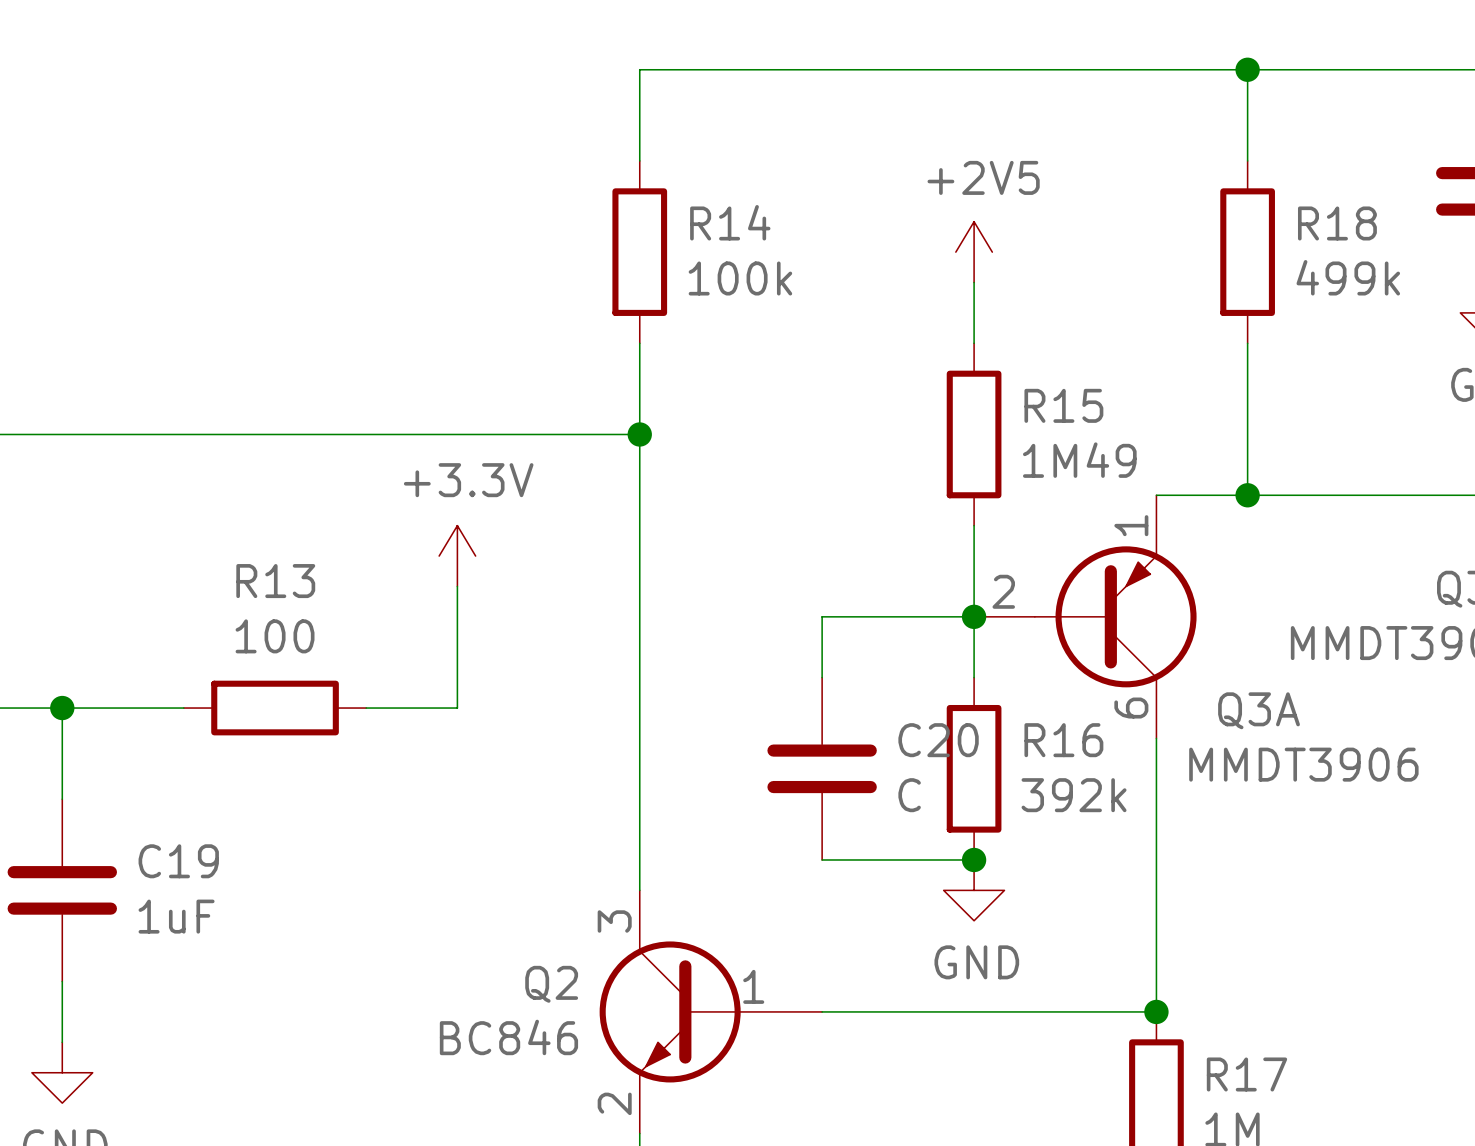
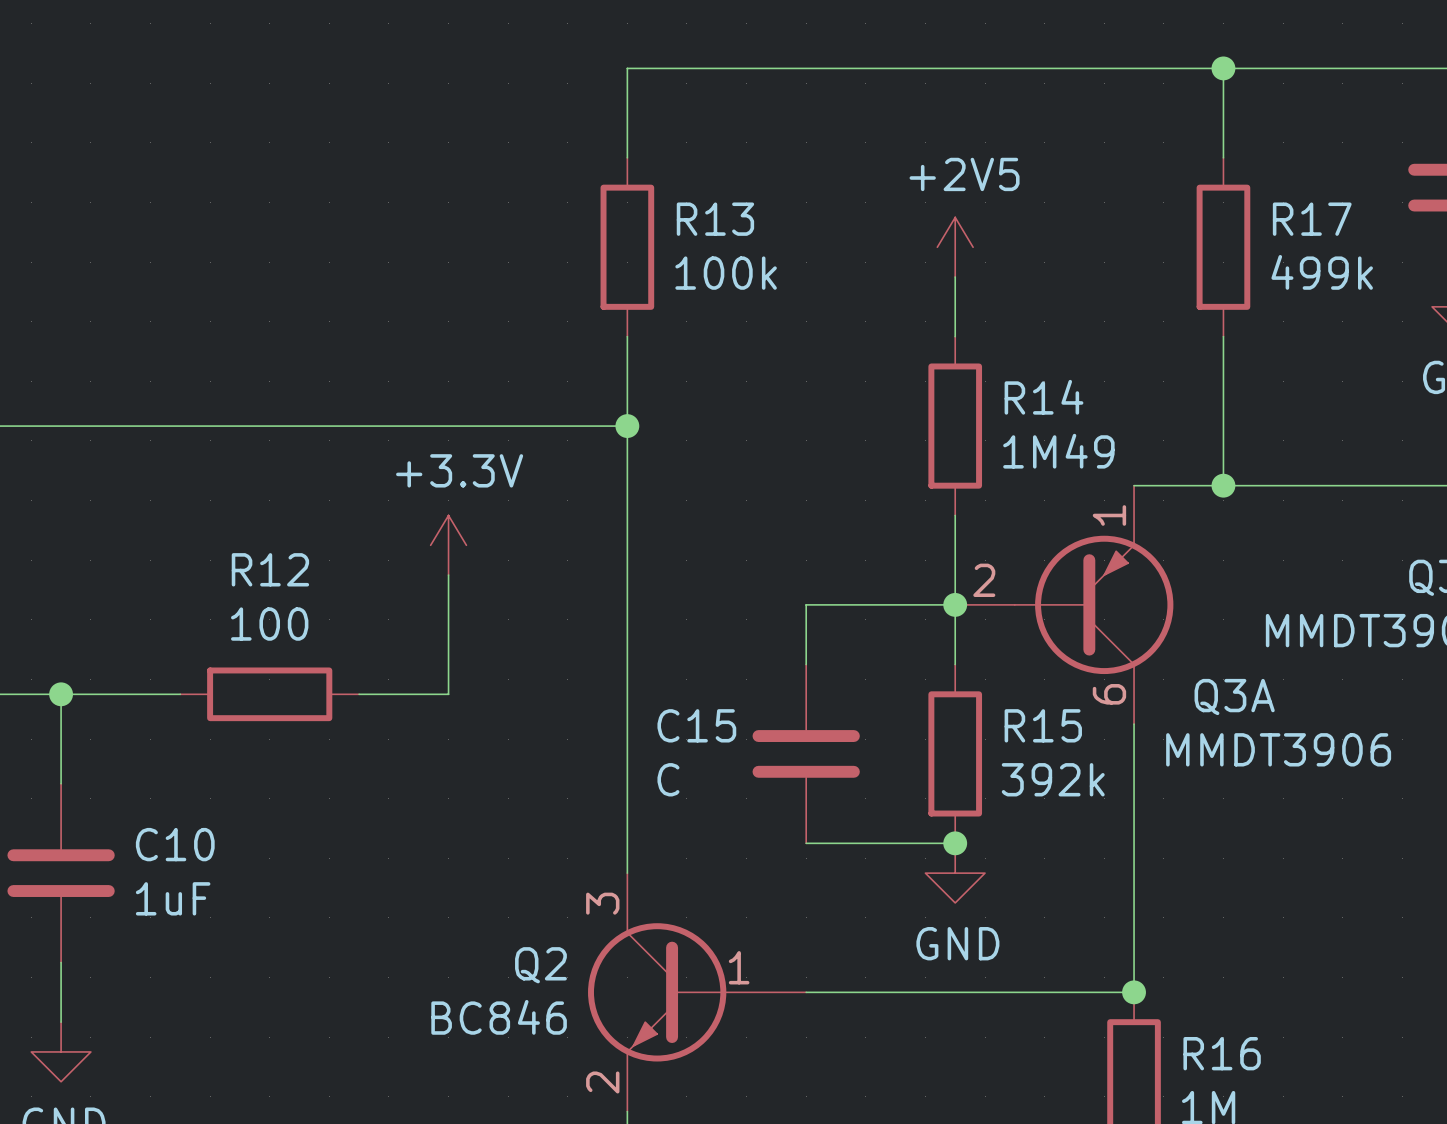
R14 name: R14 (730, 222) -> R13 (715, 219)
R18 name: R18 (1337, 223) -> R17 (1312, 219)
R15 name: R15 (1063, 405) -> R14 (1044, 397)
R13 name: R13 (275, 581) -> R12 (270, 569)
C20 name: C20 (938, 740) -> C15 (696, 725)
R16 name: R16 (1063, 740) -> R15 (1043, 725)
C20 value position: C (909, 795) -> C (668, 779)
C19 name: C19 (178, 861) -> C10 (175, 844)
R17 name: R17 (1246, 1074) -> R16 (1222, 1053)

